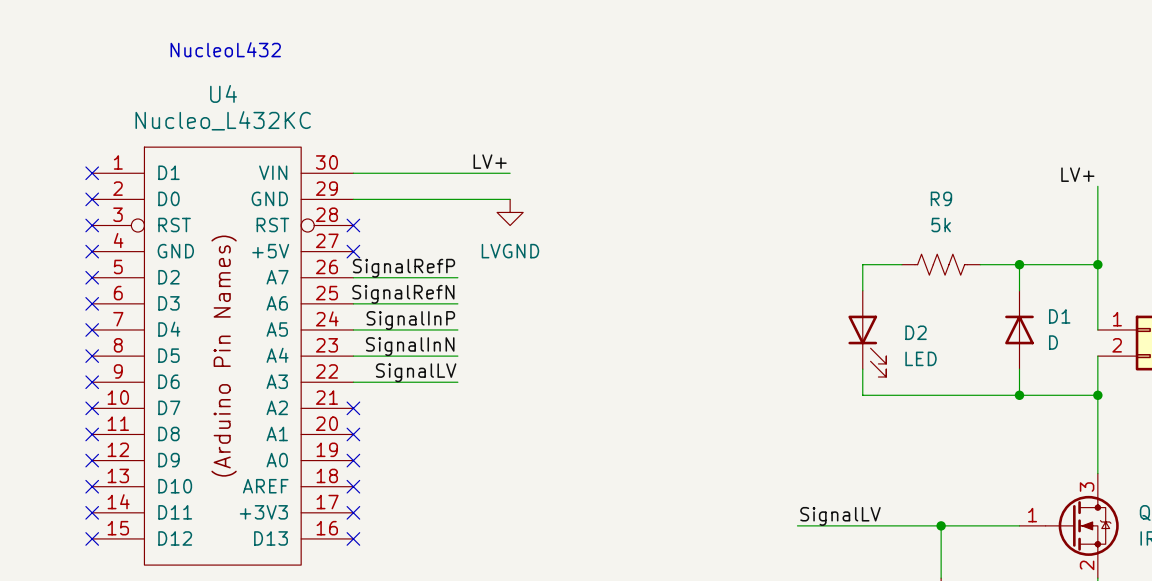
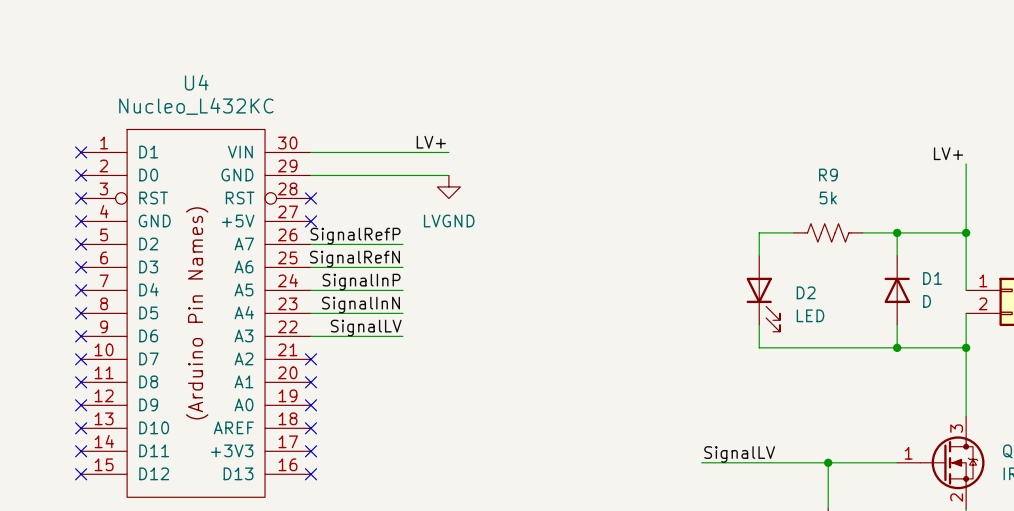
text: NucleoL432 (225, 49) -> none

